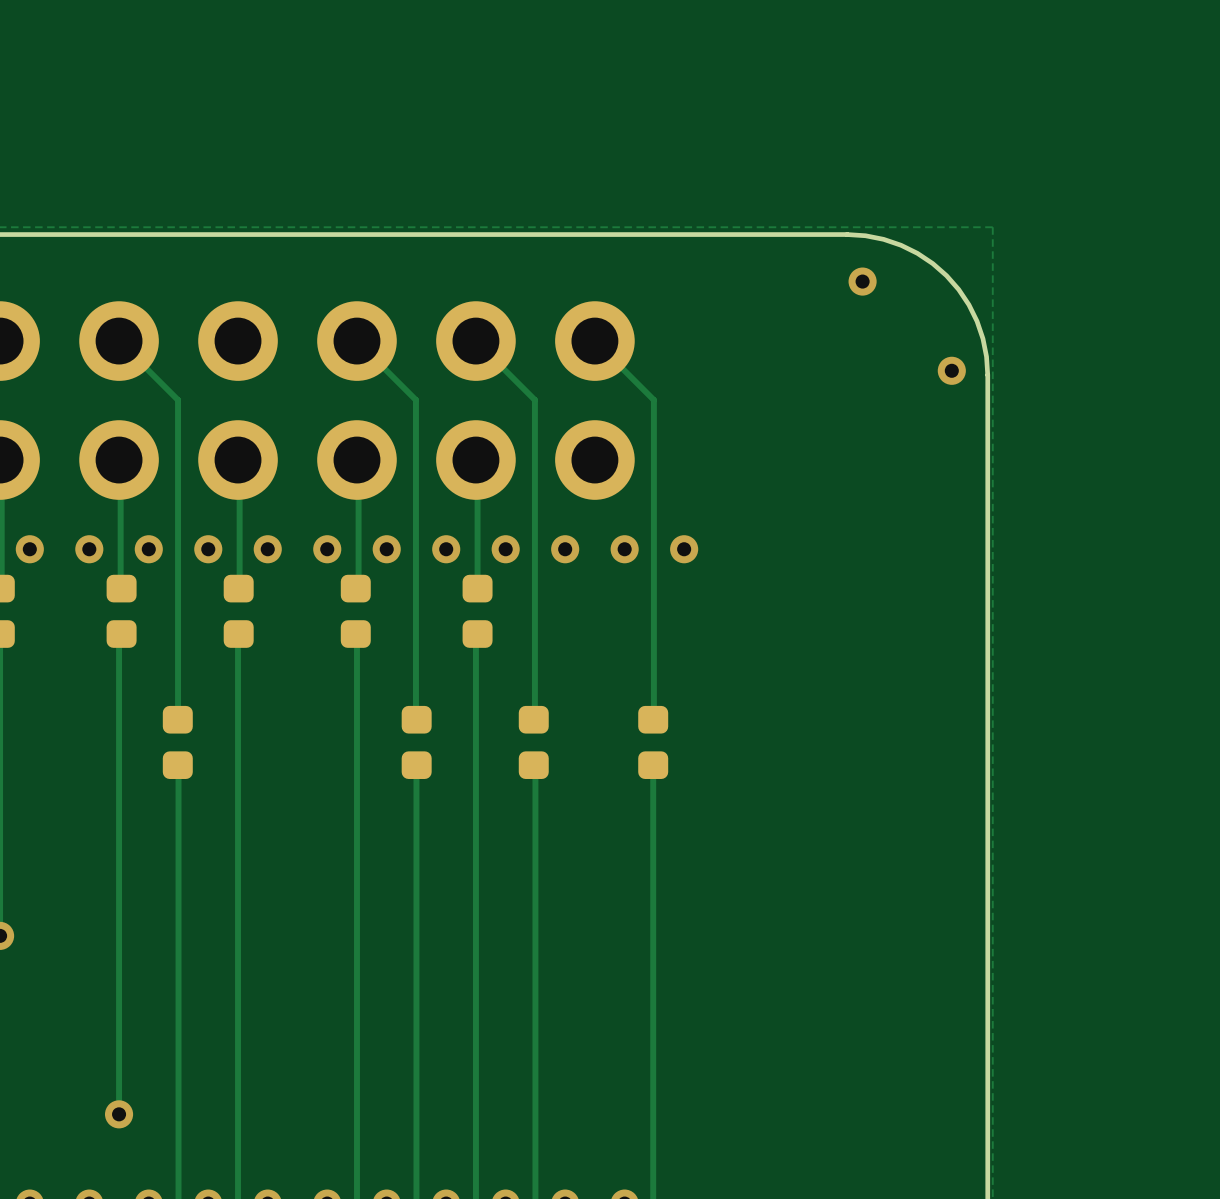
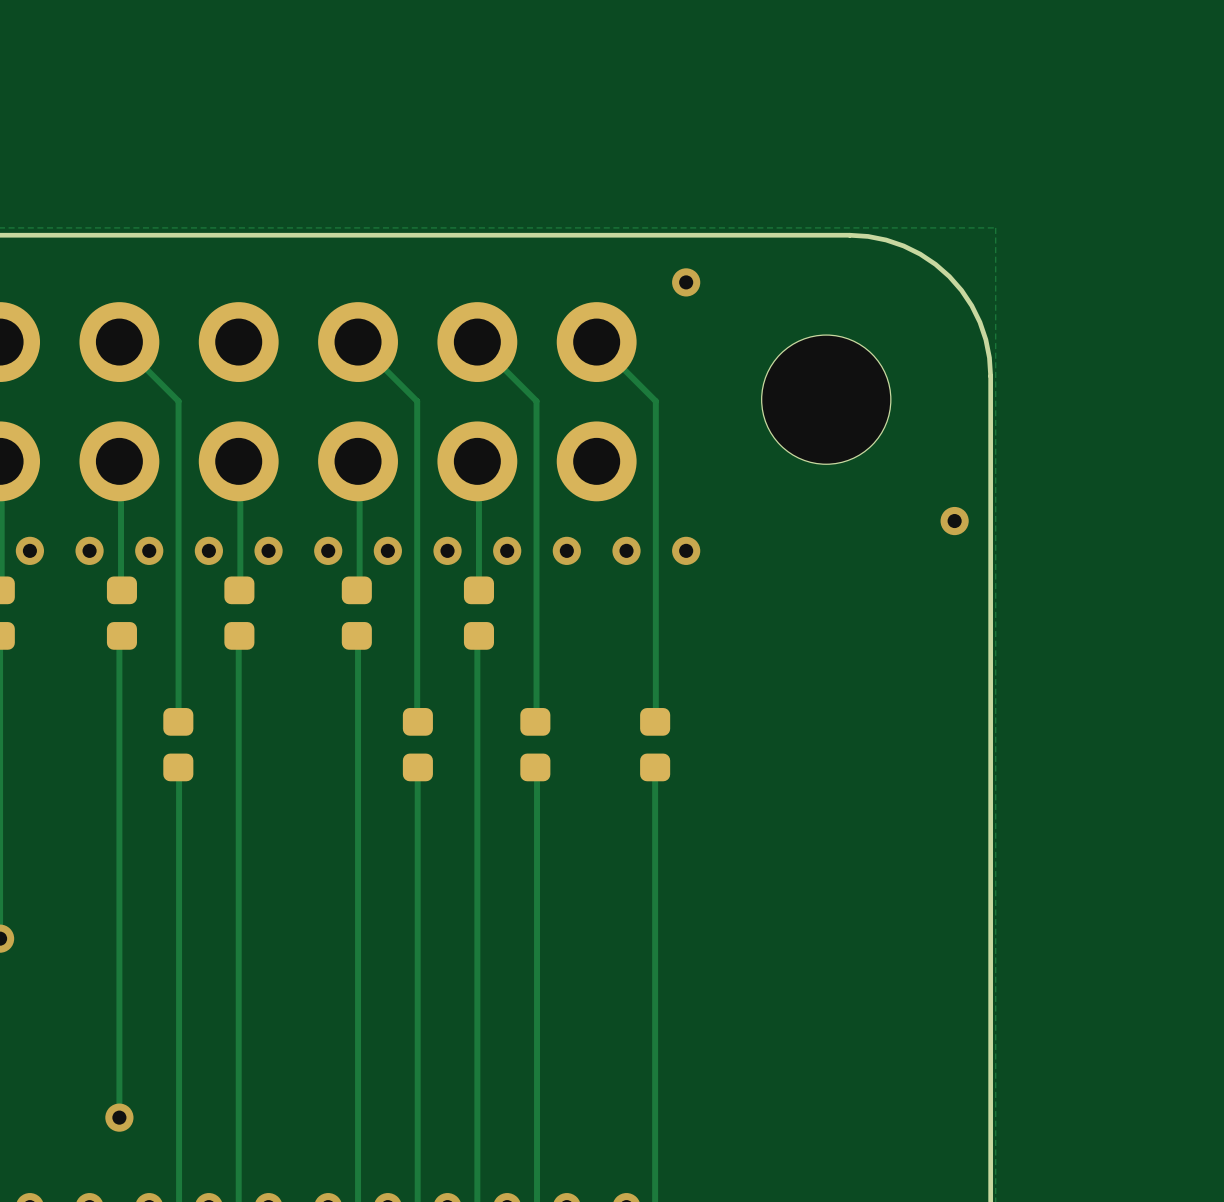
via: none -> (686, 282)
via: (862, 281) -> none
via: (951, 370) -> none
part: none -> (826, 399)
via: none -> (954, 521)

